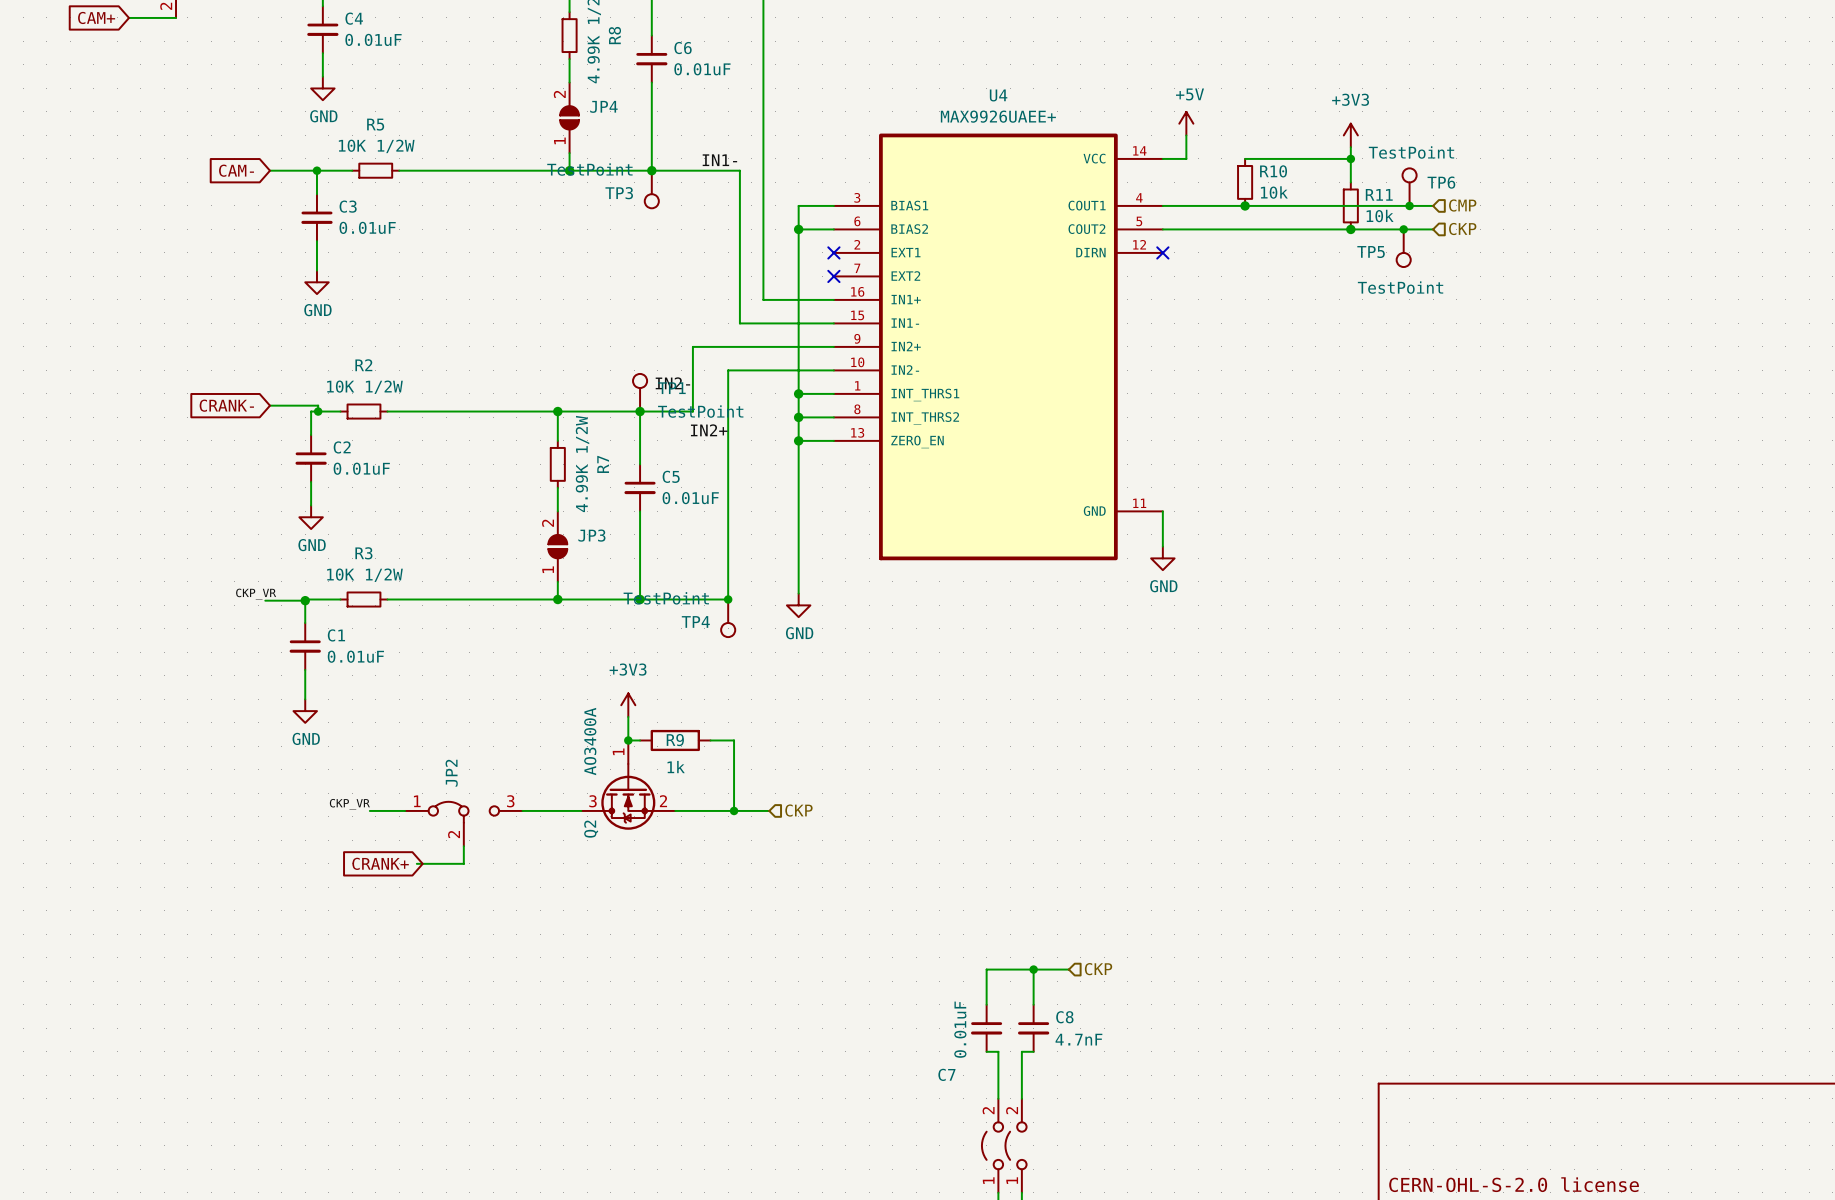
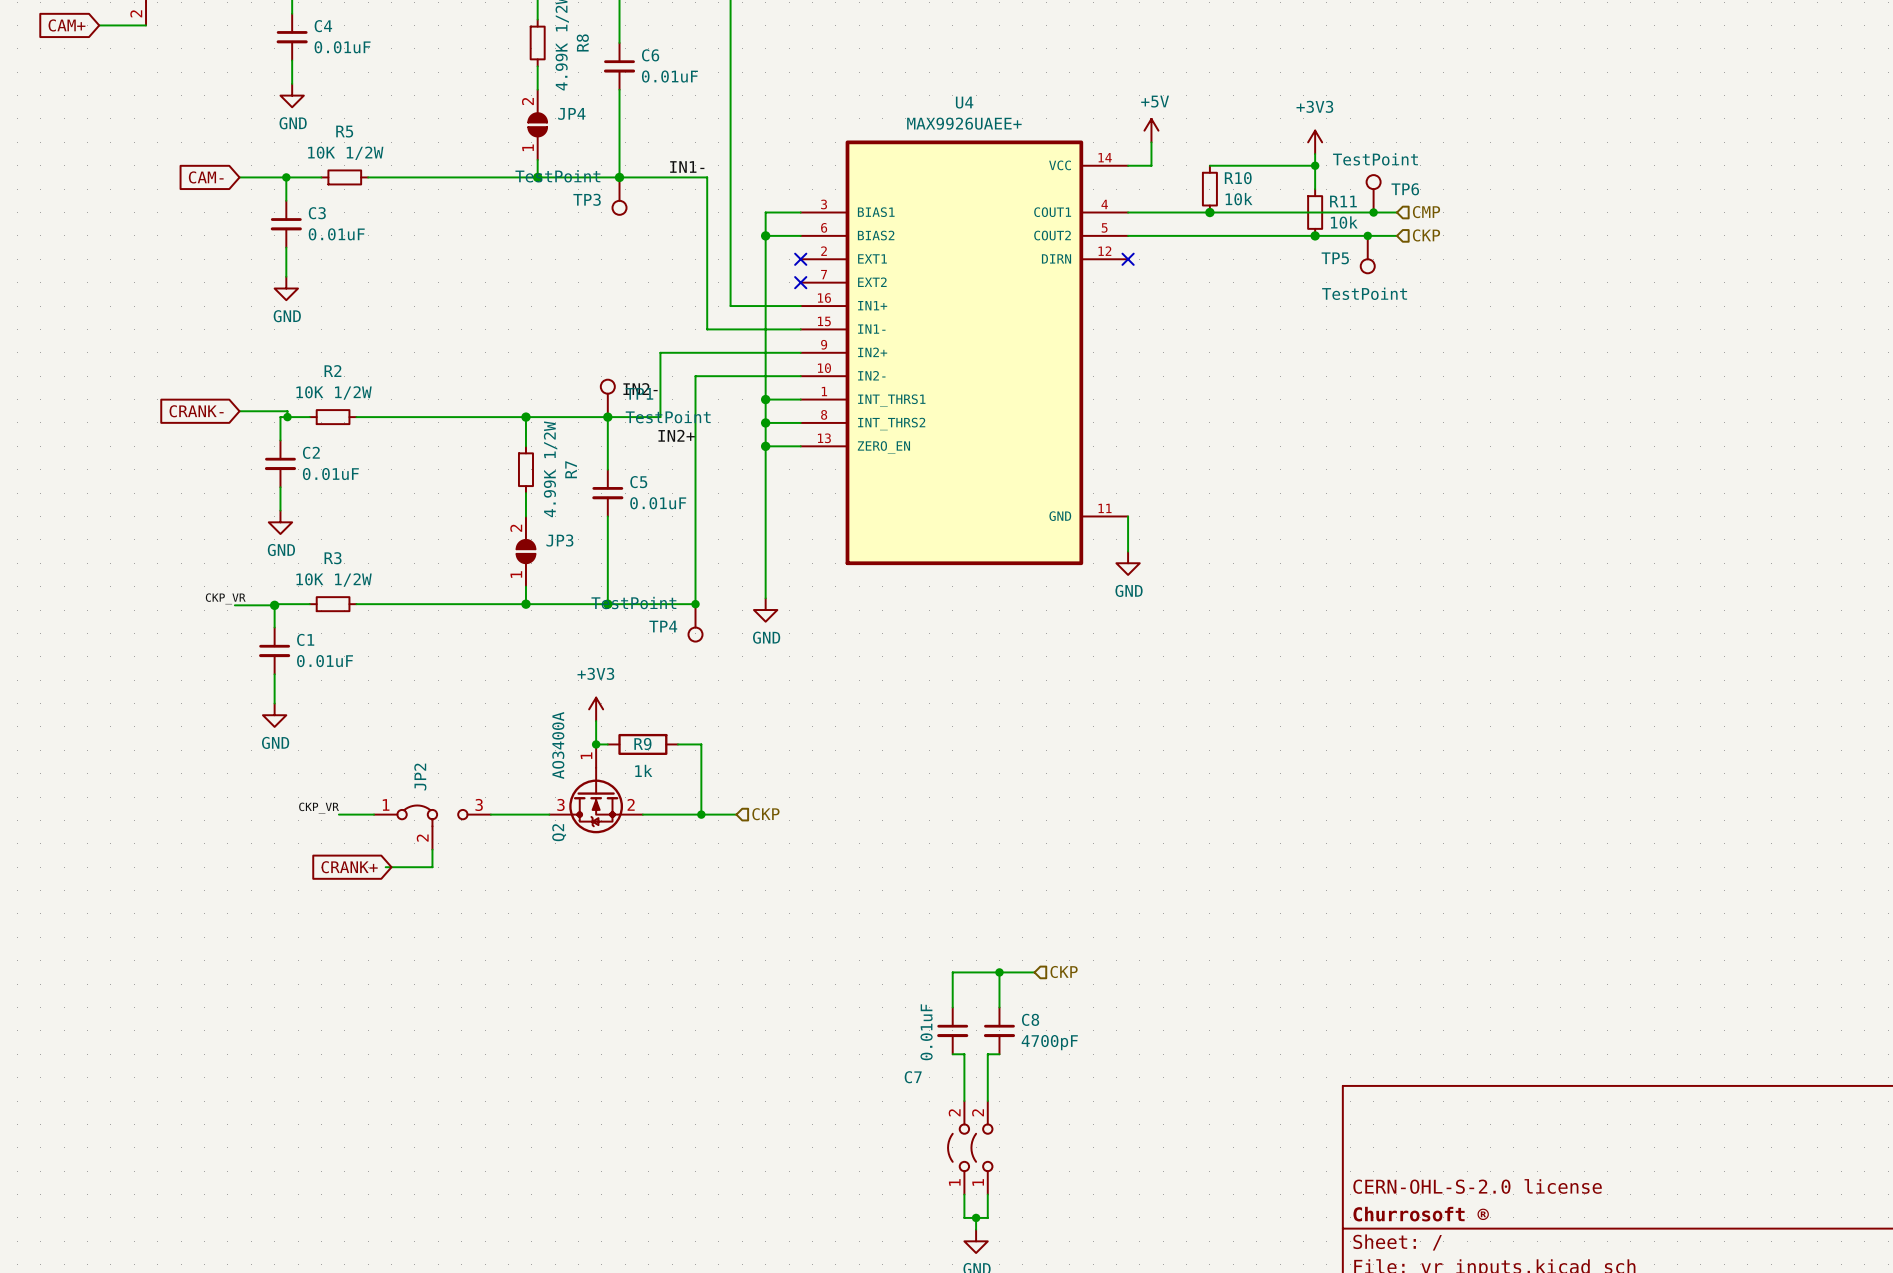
C8 value: 4.7nF (1078, 1039) -> 4700pF (1049, 1042)

